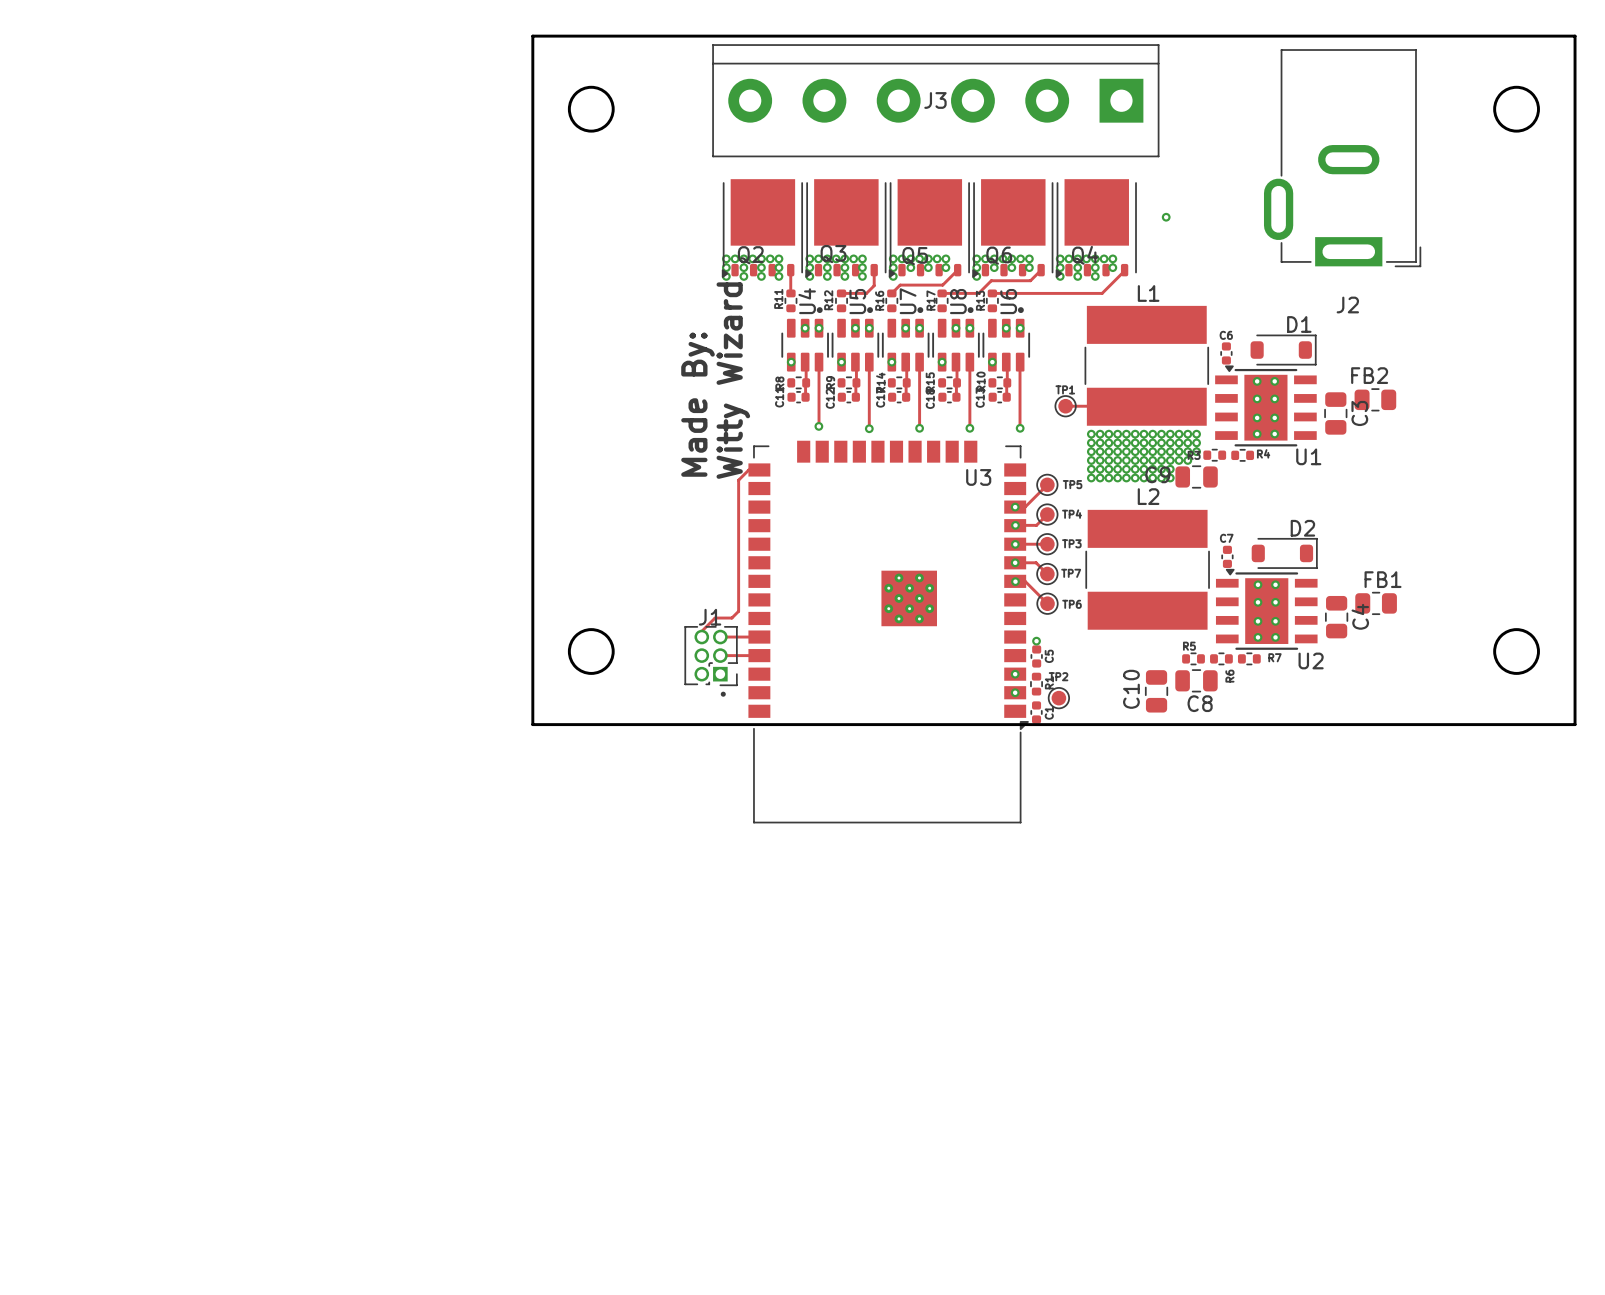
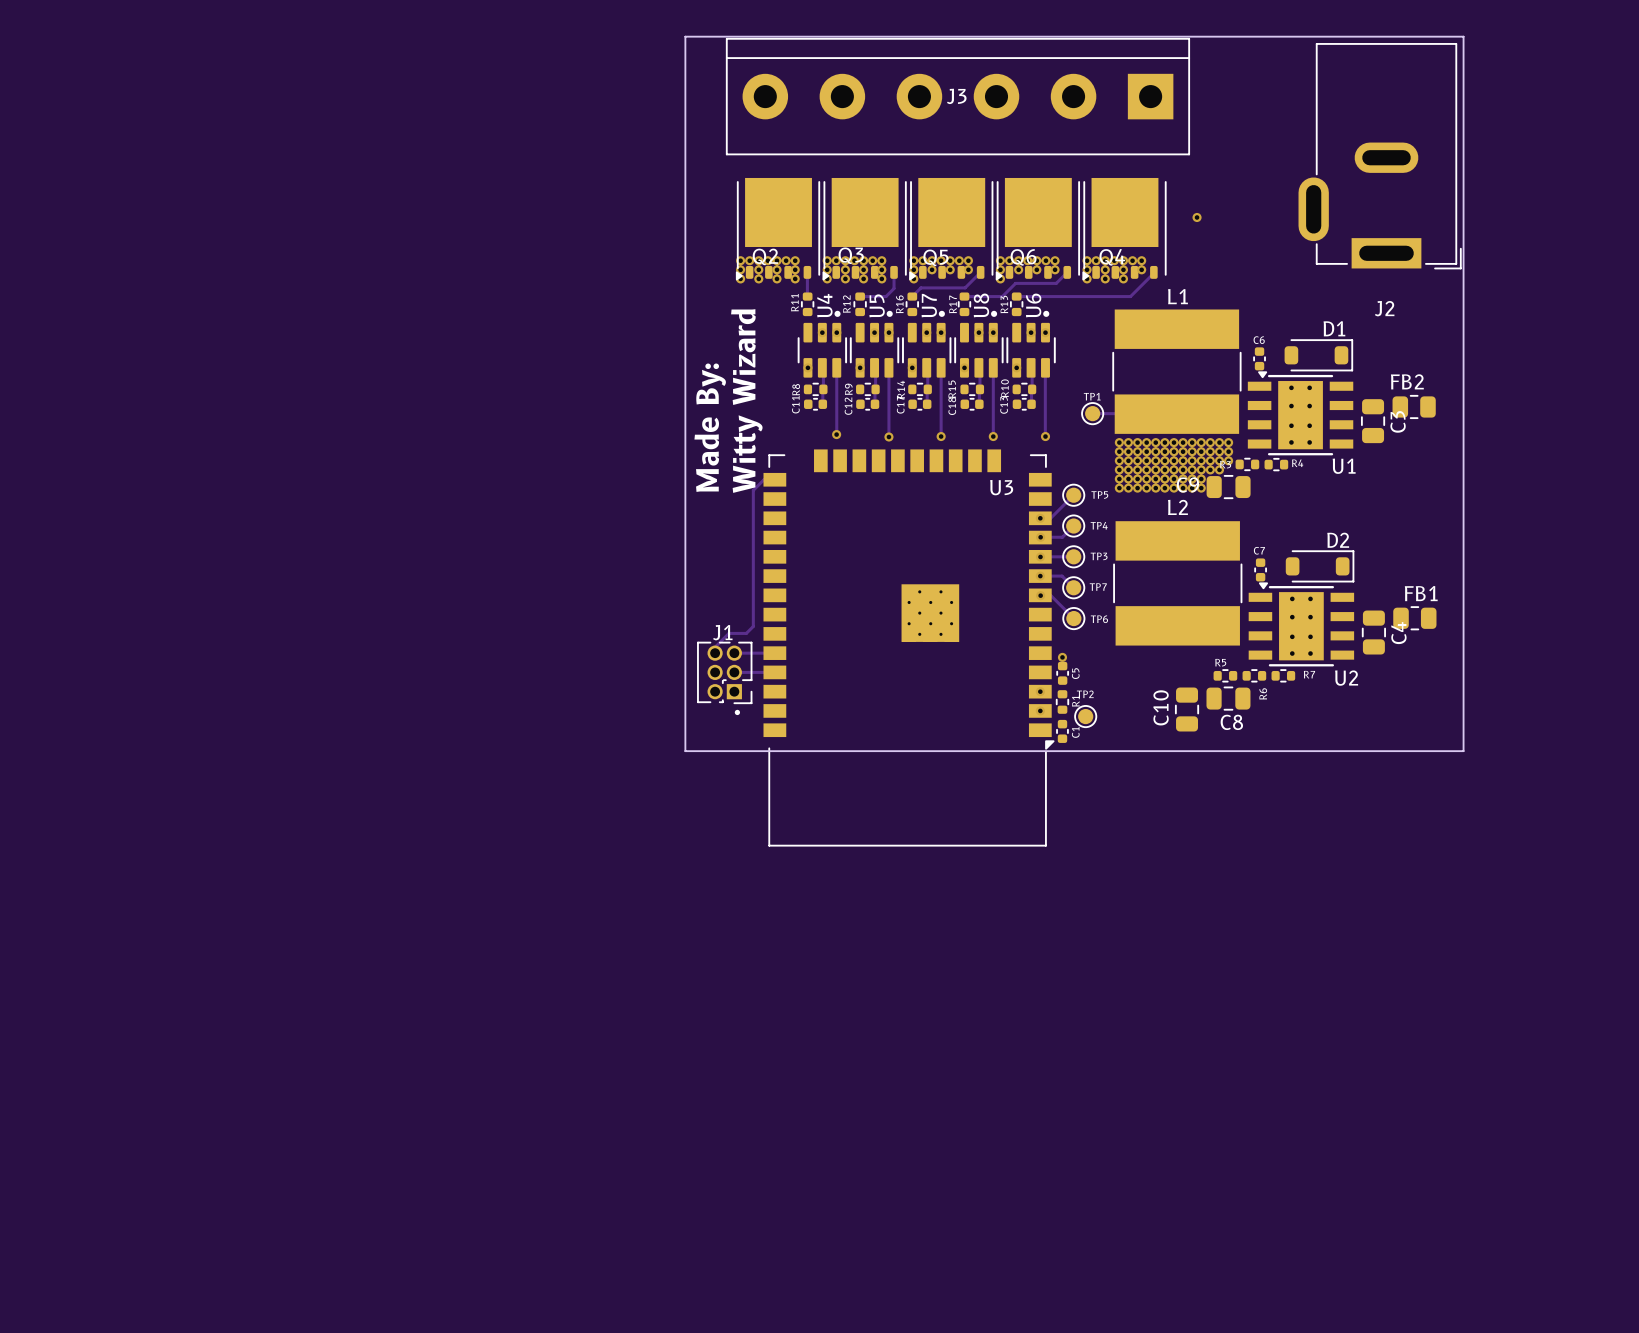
board edge: (532, 36) (1575, 36) (1575, 724) (532, 724) (532, 36) -> (685, 36) (685, 751) (1463, 751) (1463, 36) (685, 36)
round board edge: [567, 85, 615, 133] -> none
round board edge: [1493, 85, 1540, 133] -> none
round board edge: [567, 628, 615, 675] -> none
round board edge: [1493, 628, 1540, 675] -> none

